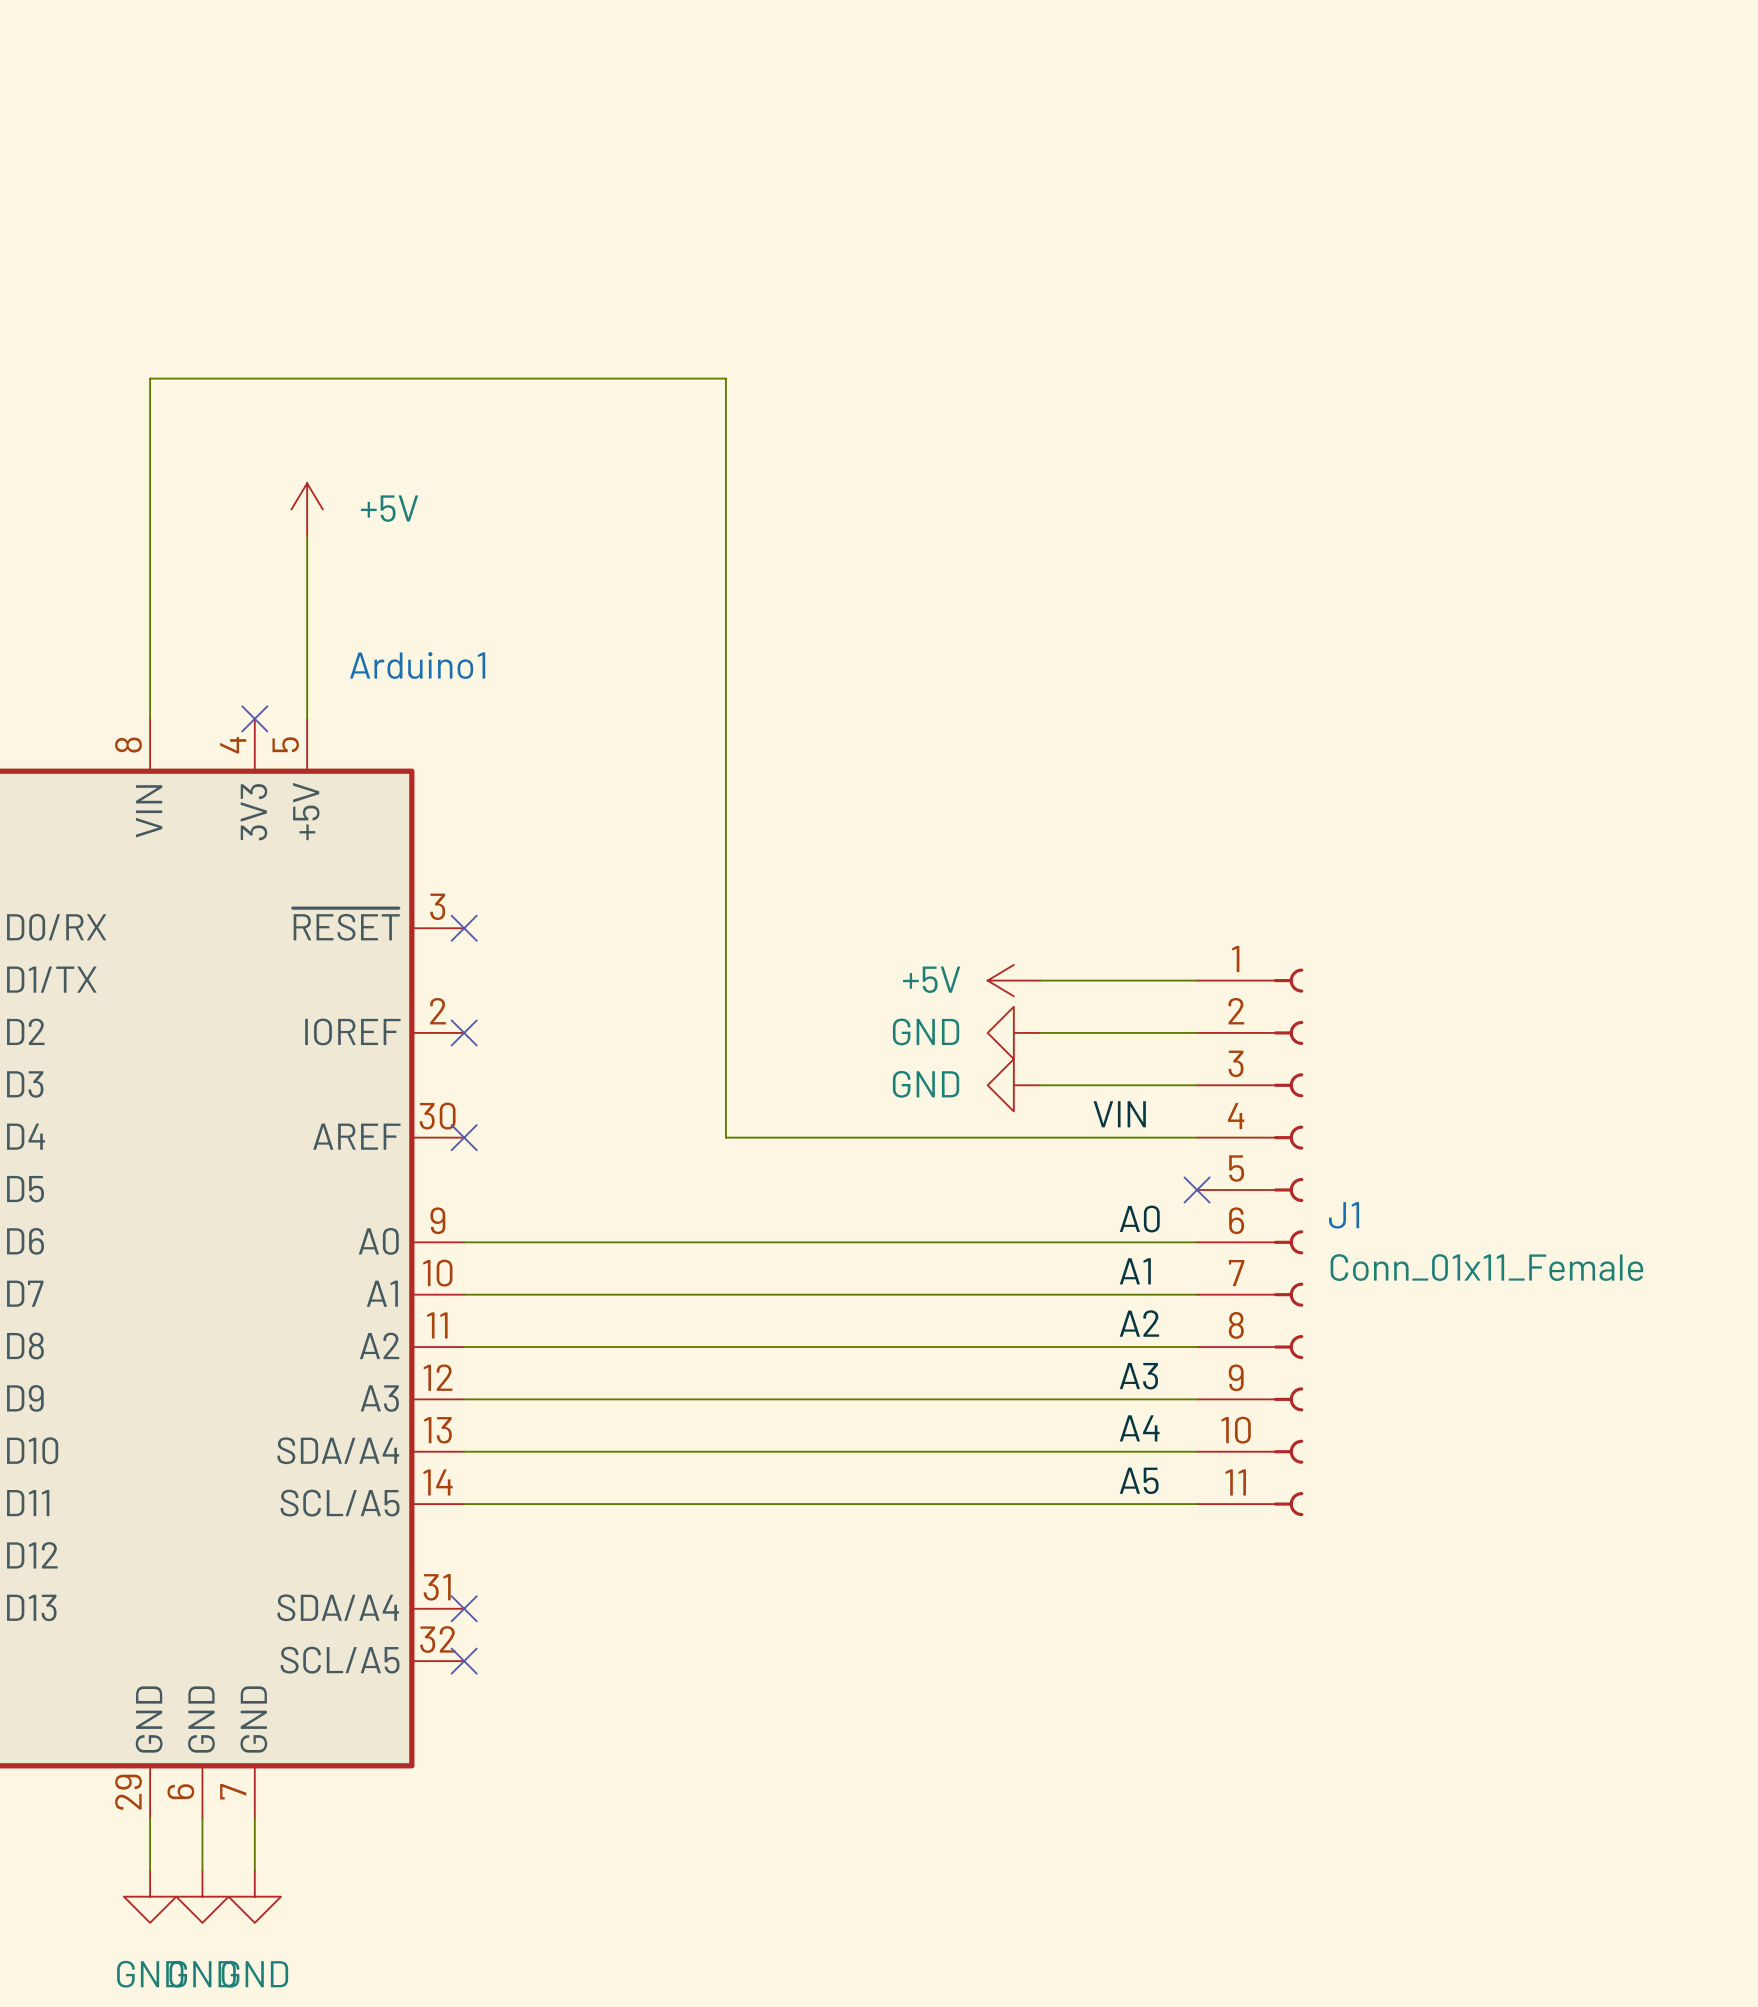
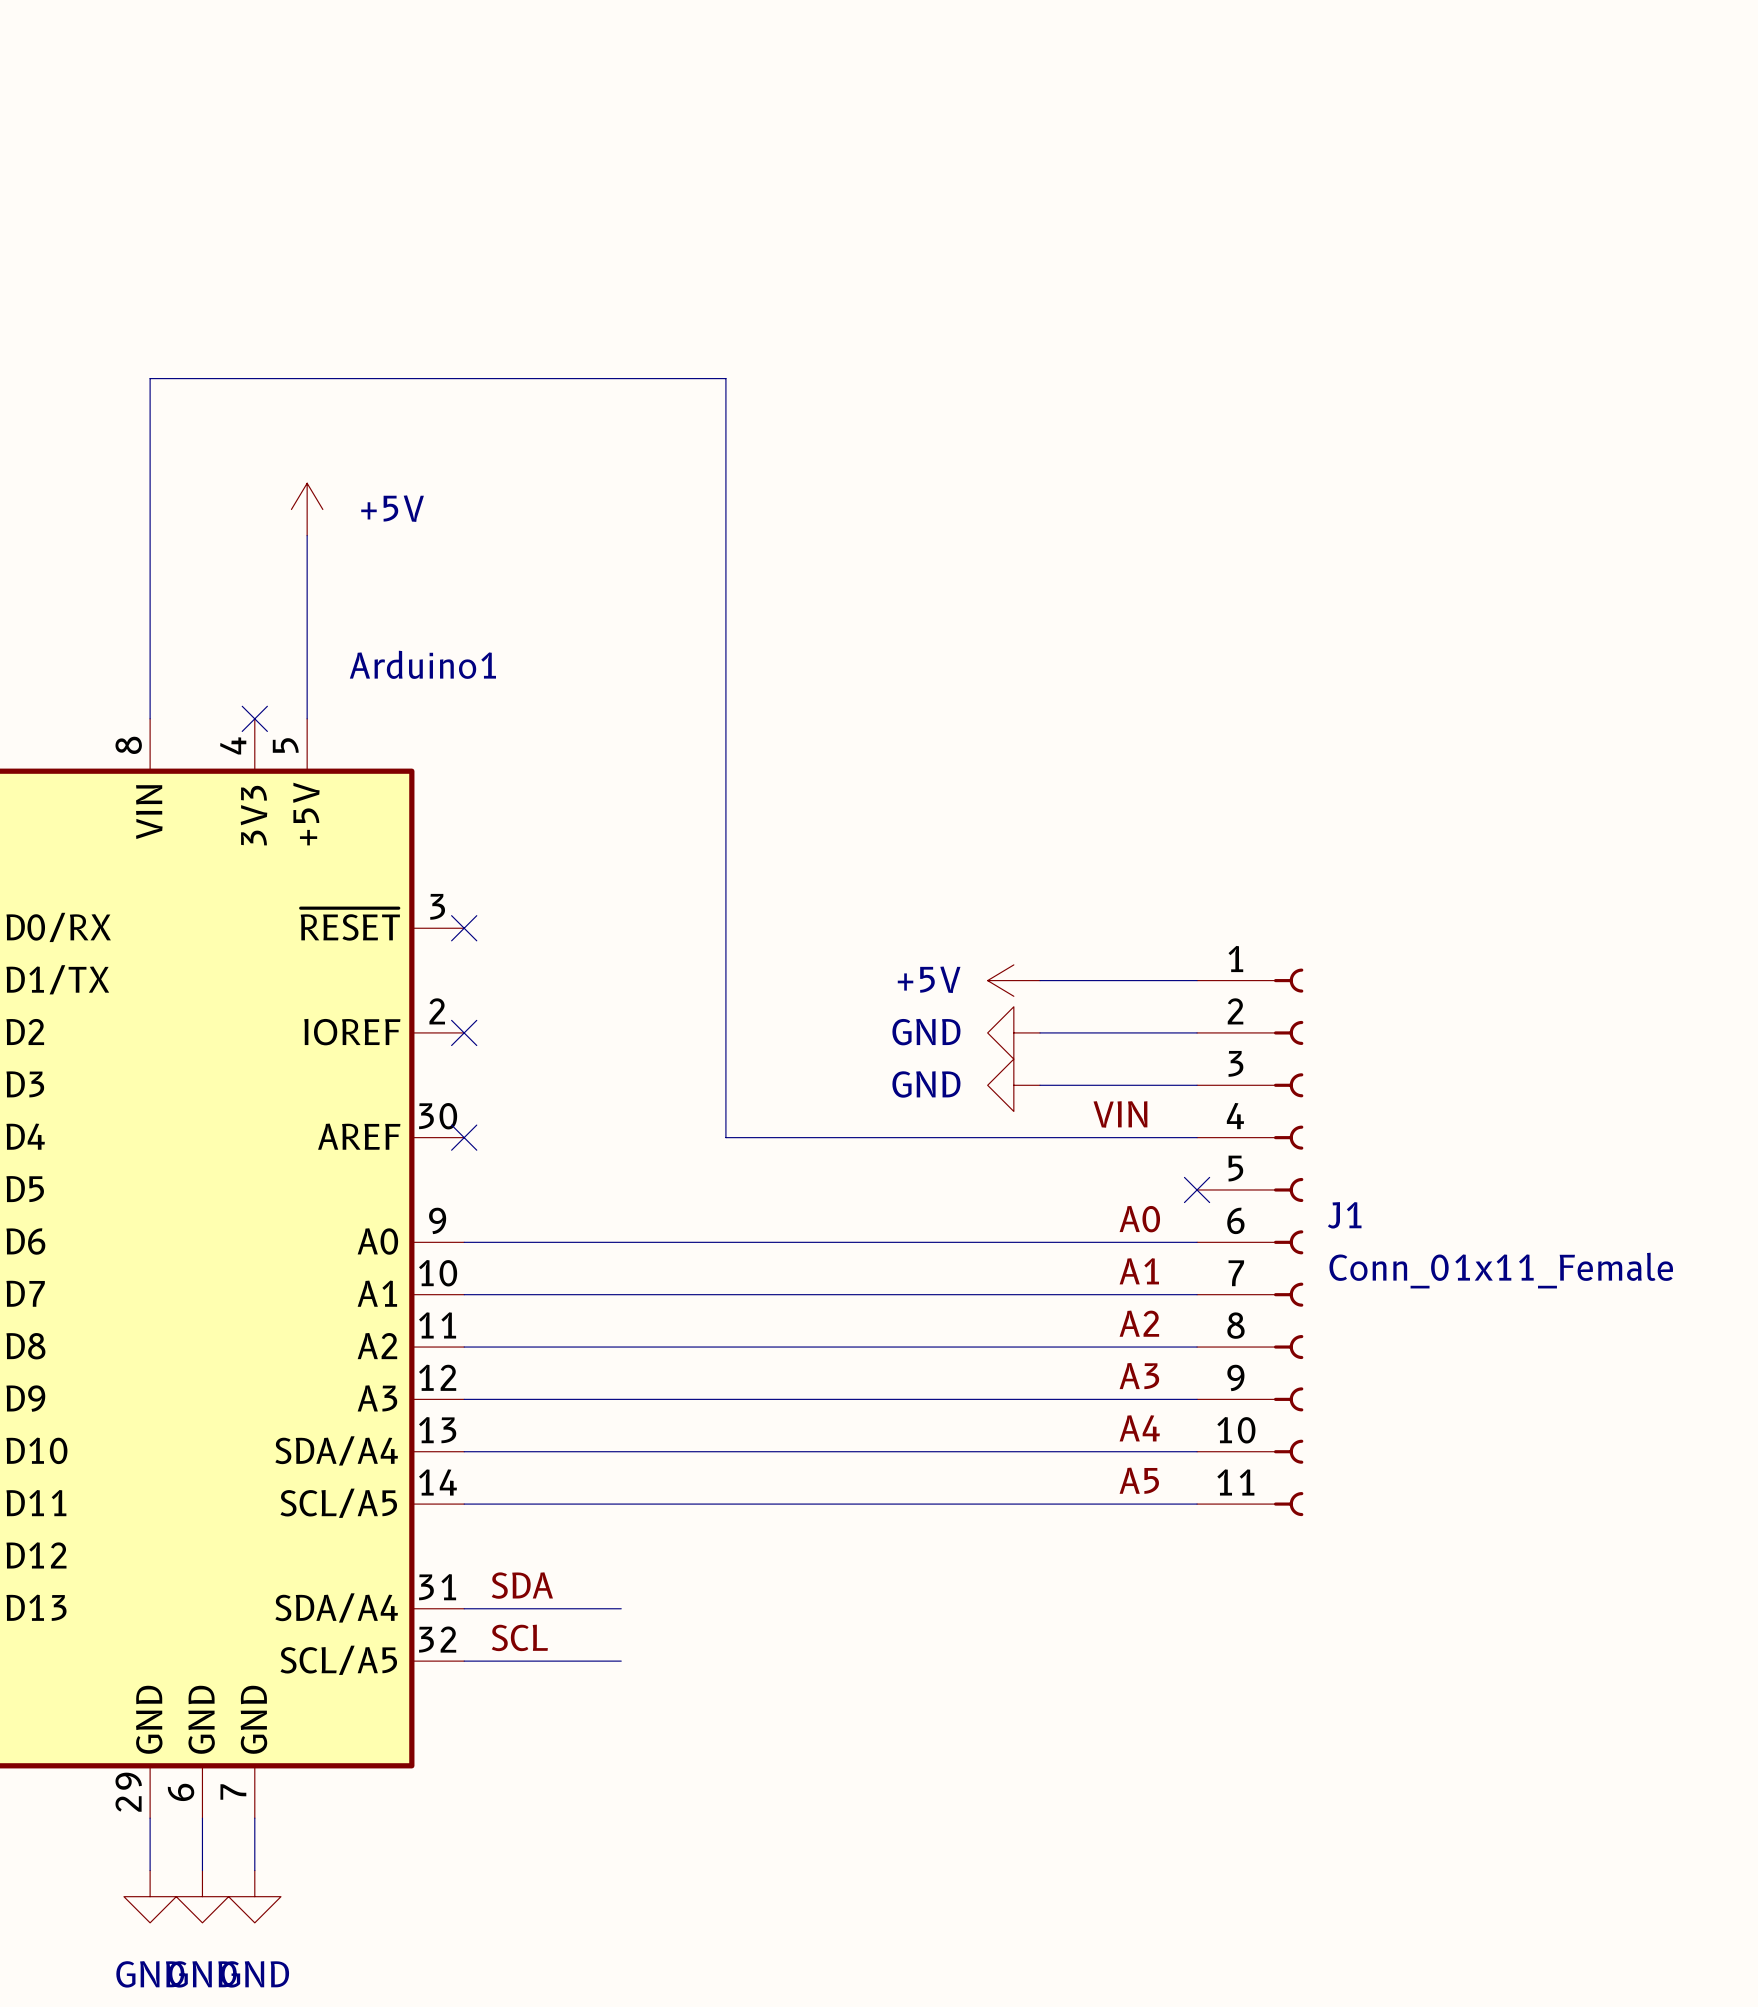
label: none -> SDA (522, 1585)
wire: none -> (464, 1608) (621, 1608)
no-connect mark: (464, 1608) -> none
label: none -> SCL (519, 1637)
wire: none -> (464, 1661) (621, 1661)
no-connect mark: (464, 1661) -> none

